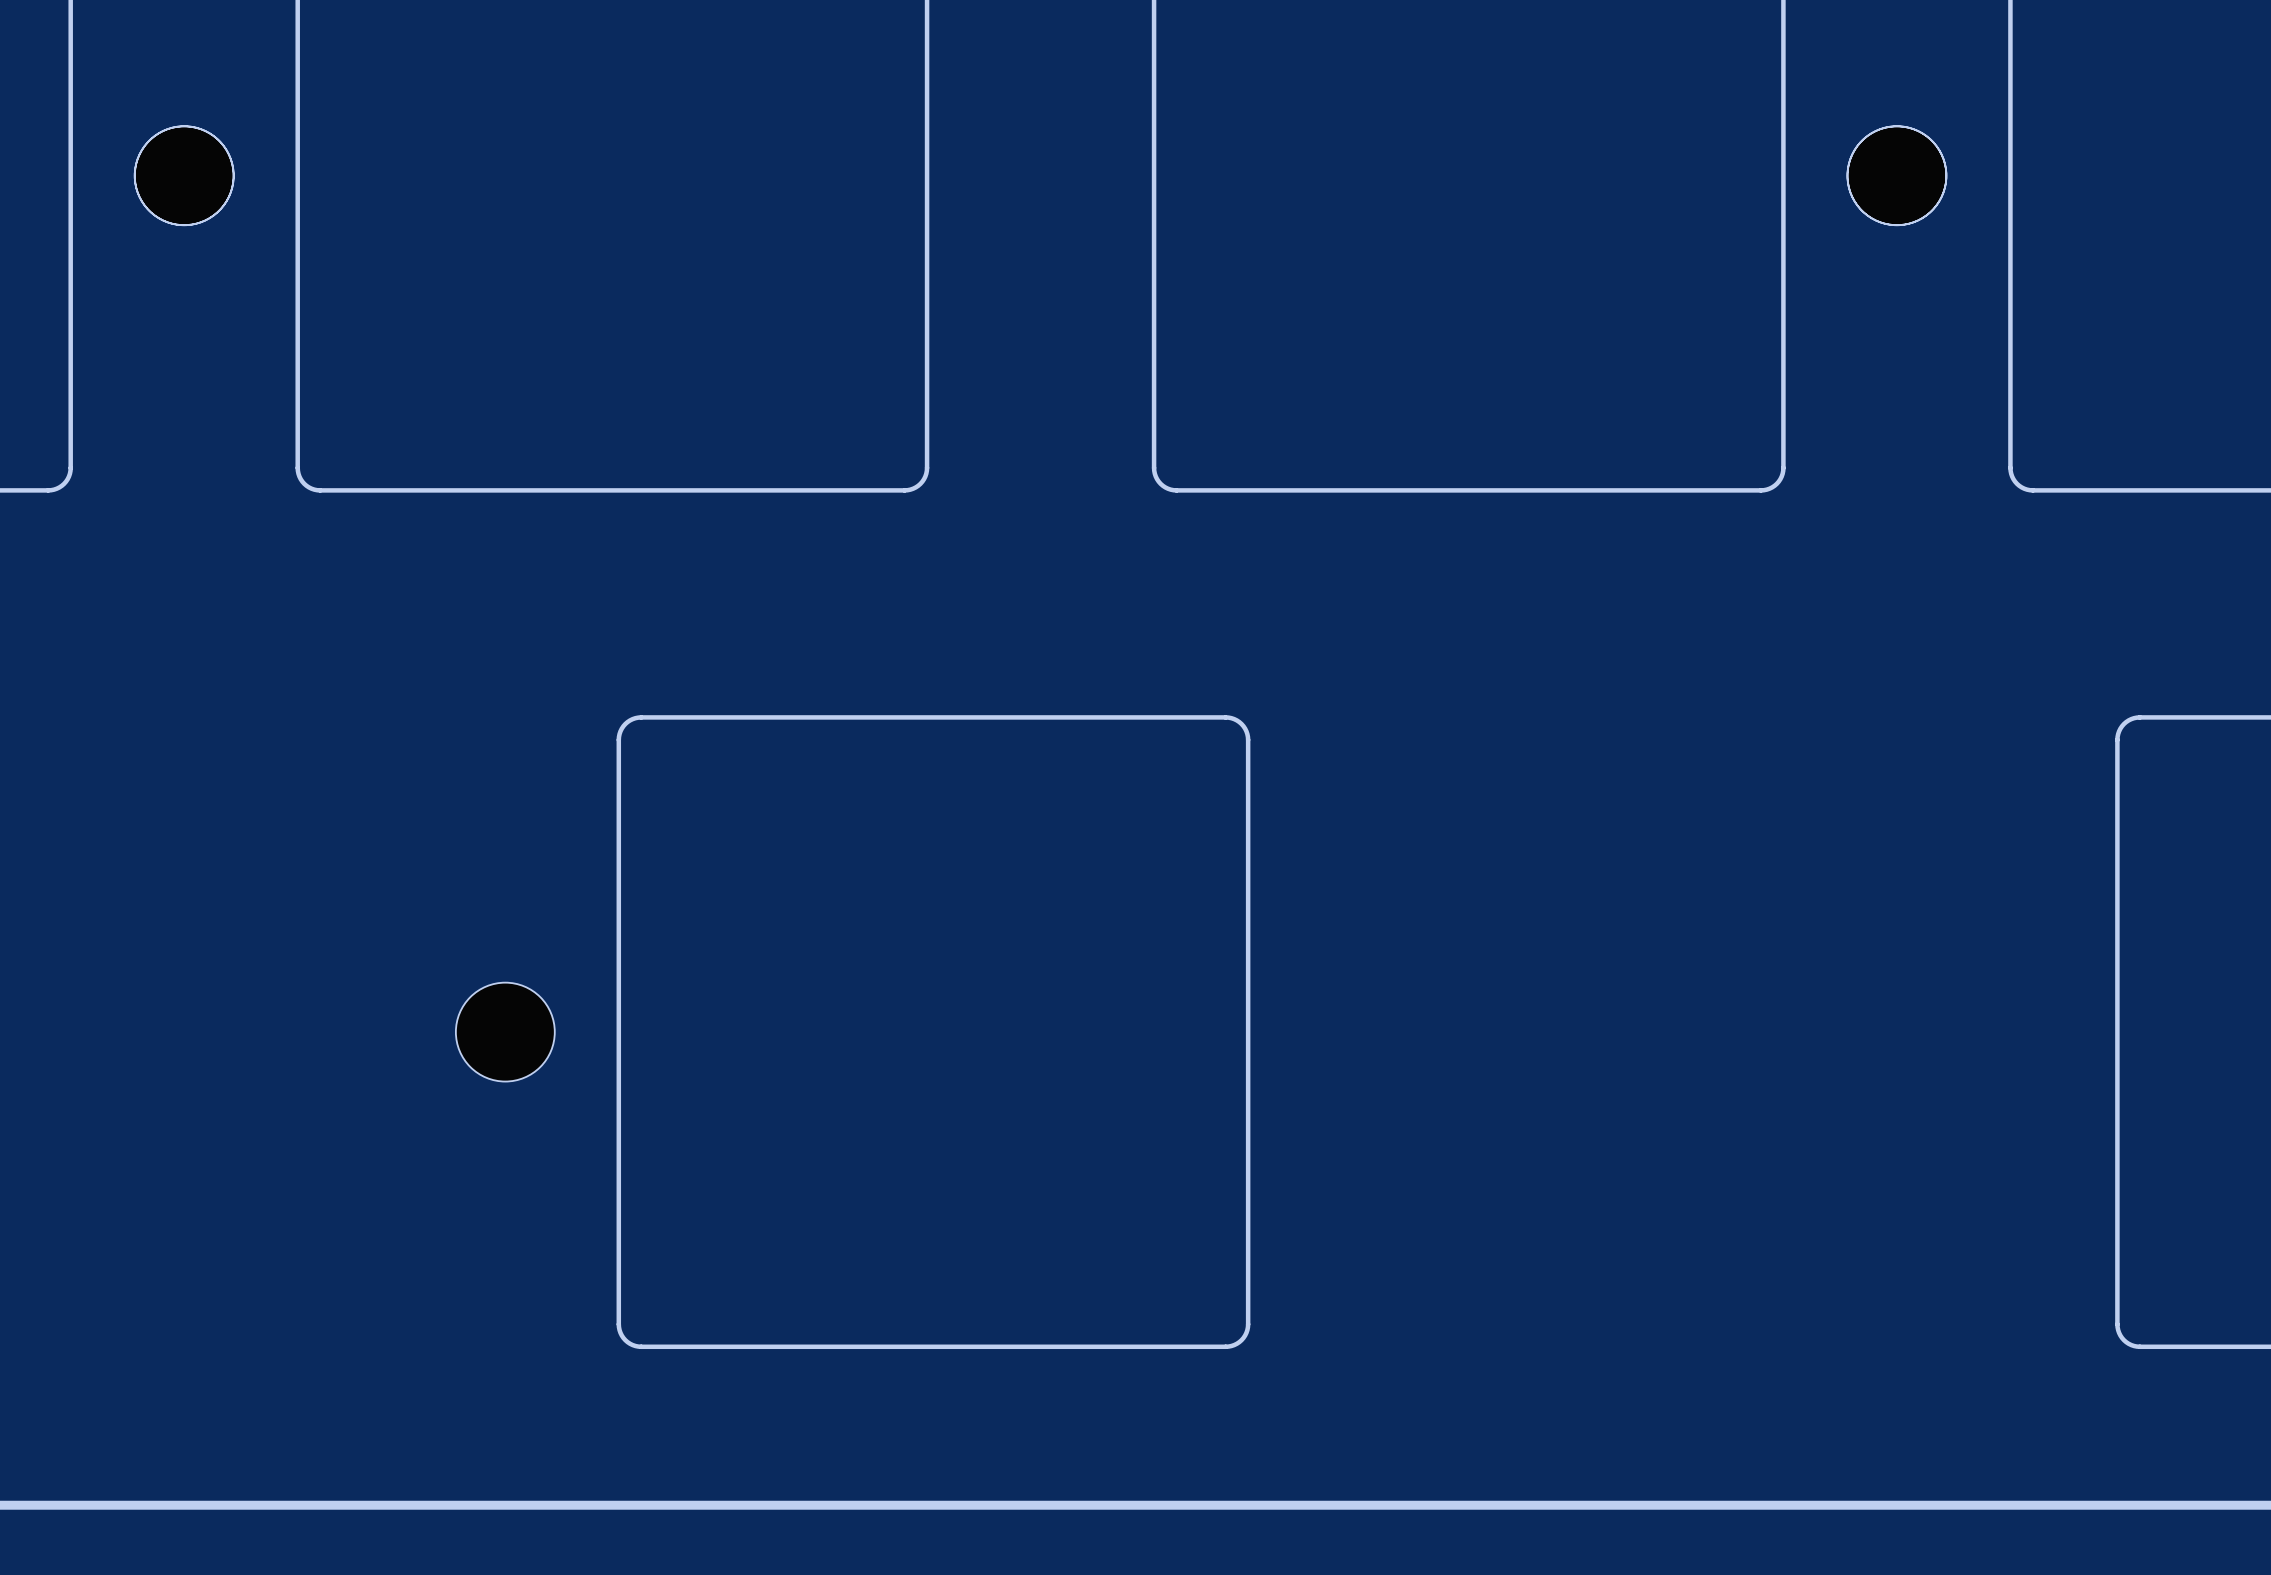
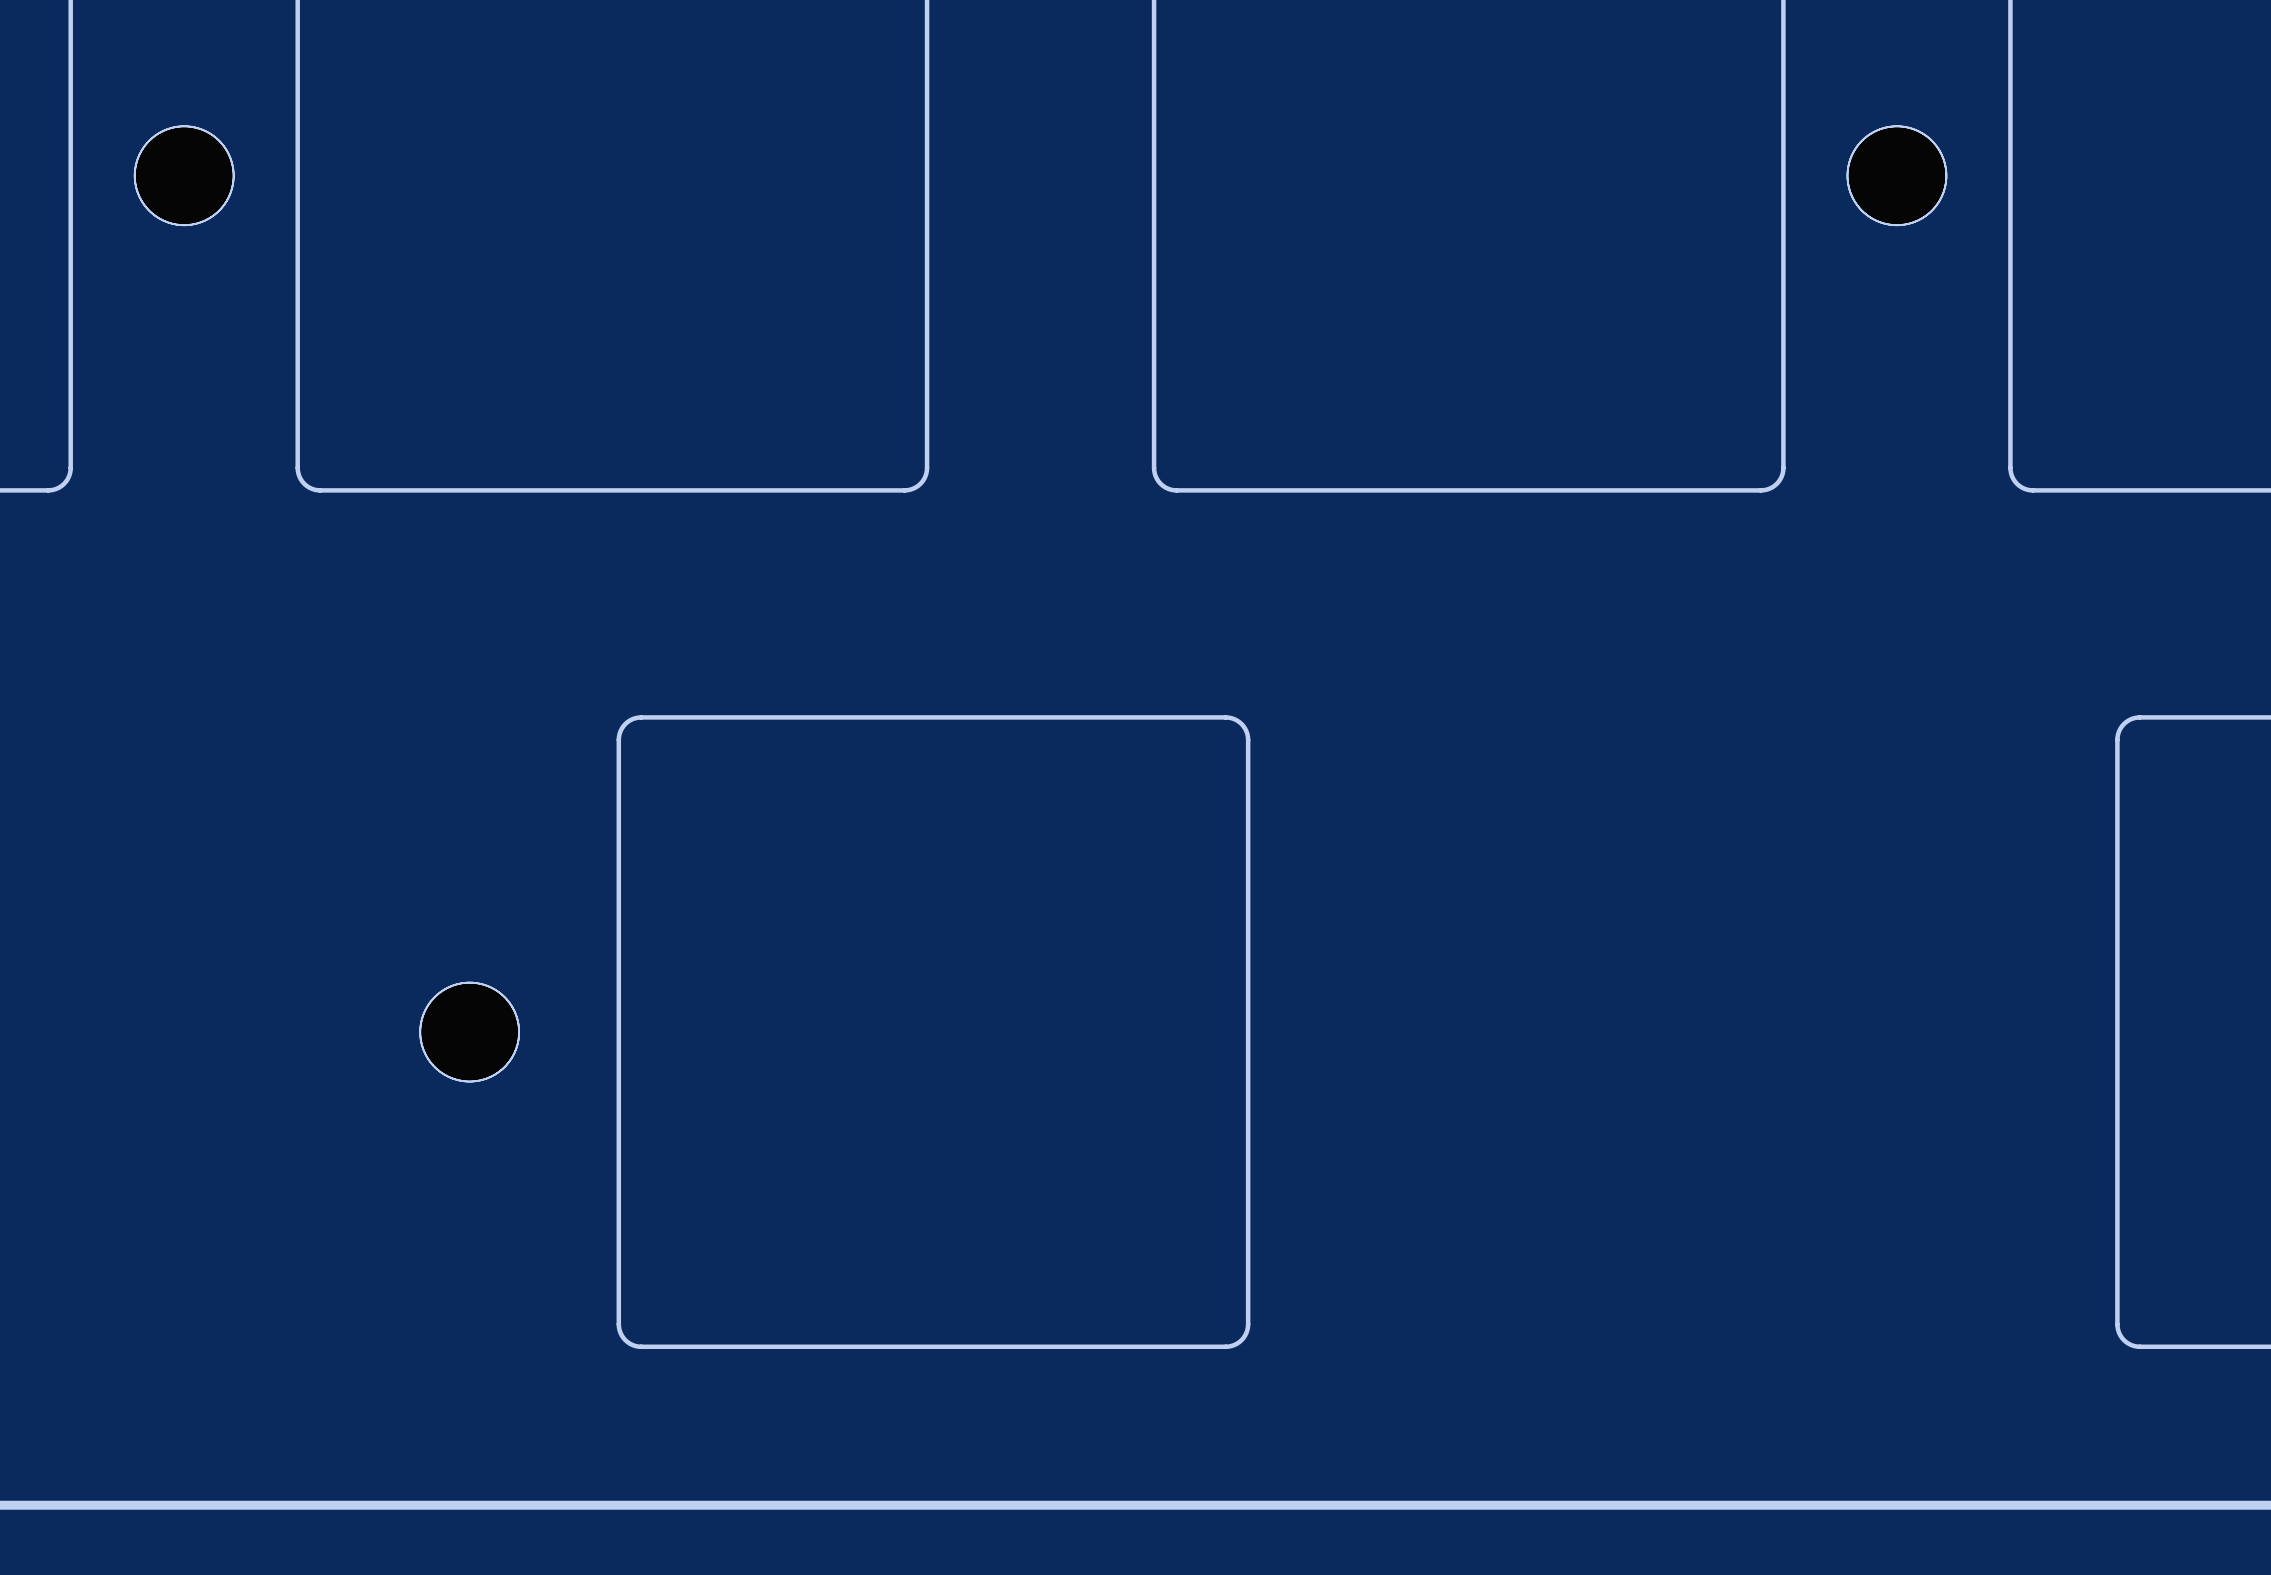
part position: (505, 1032) -> (469, 1032)

